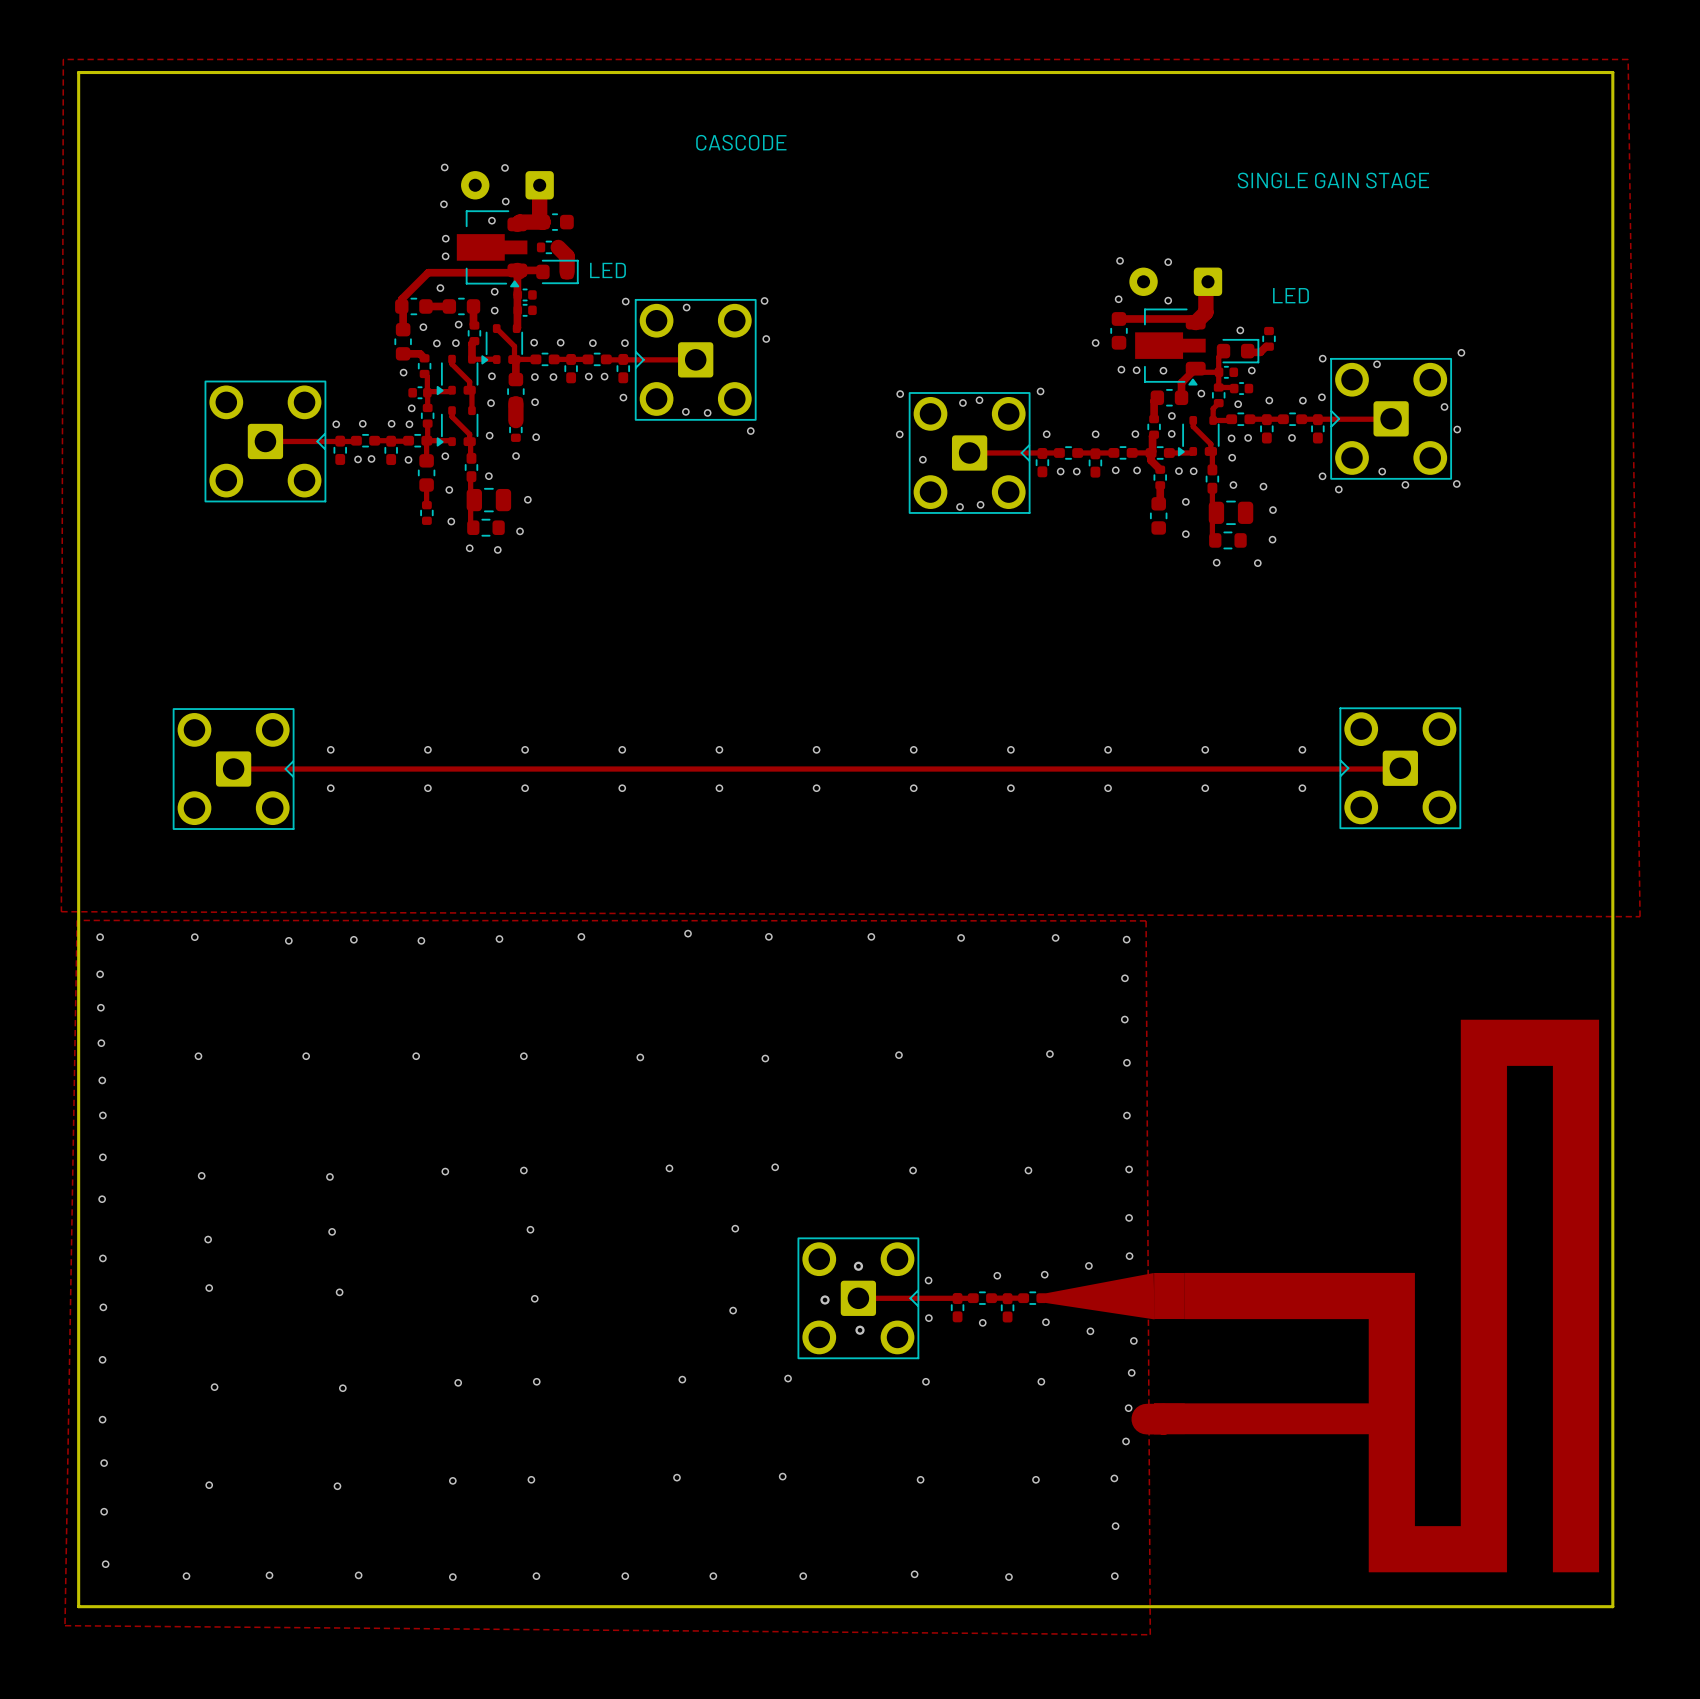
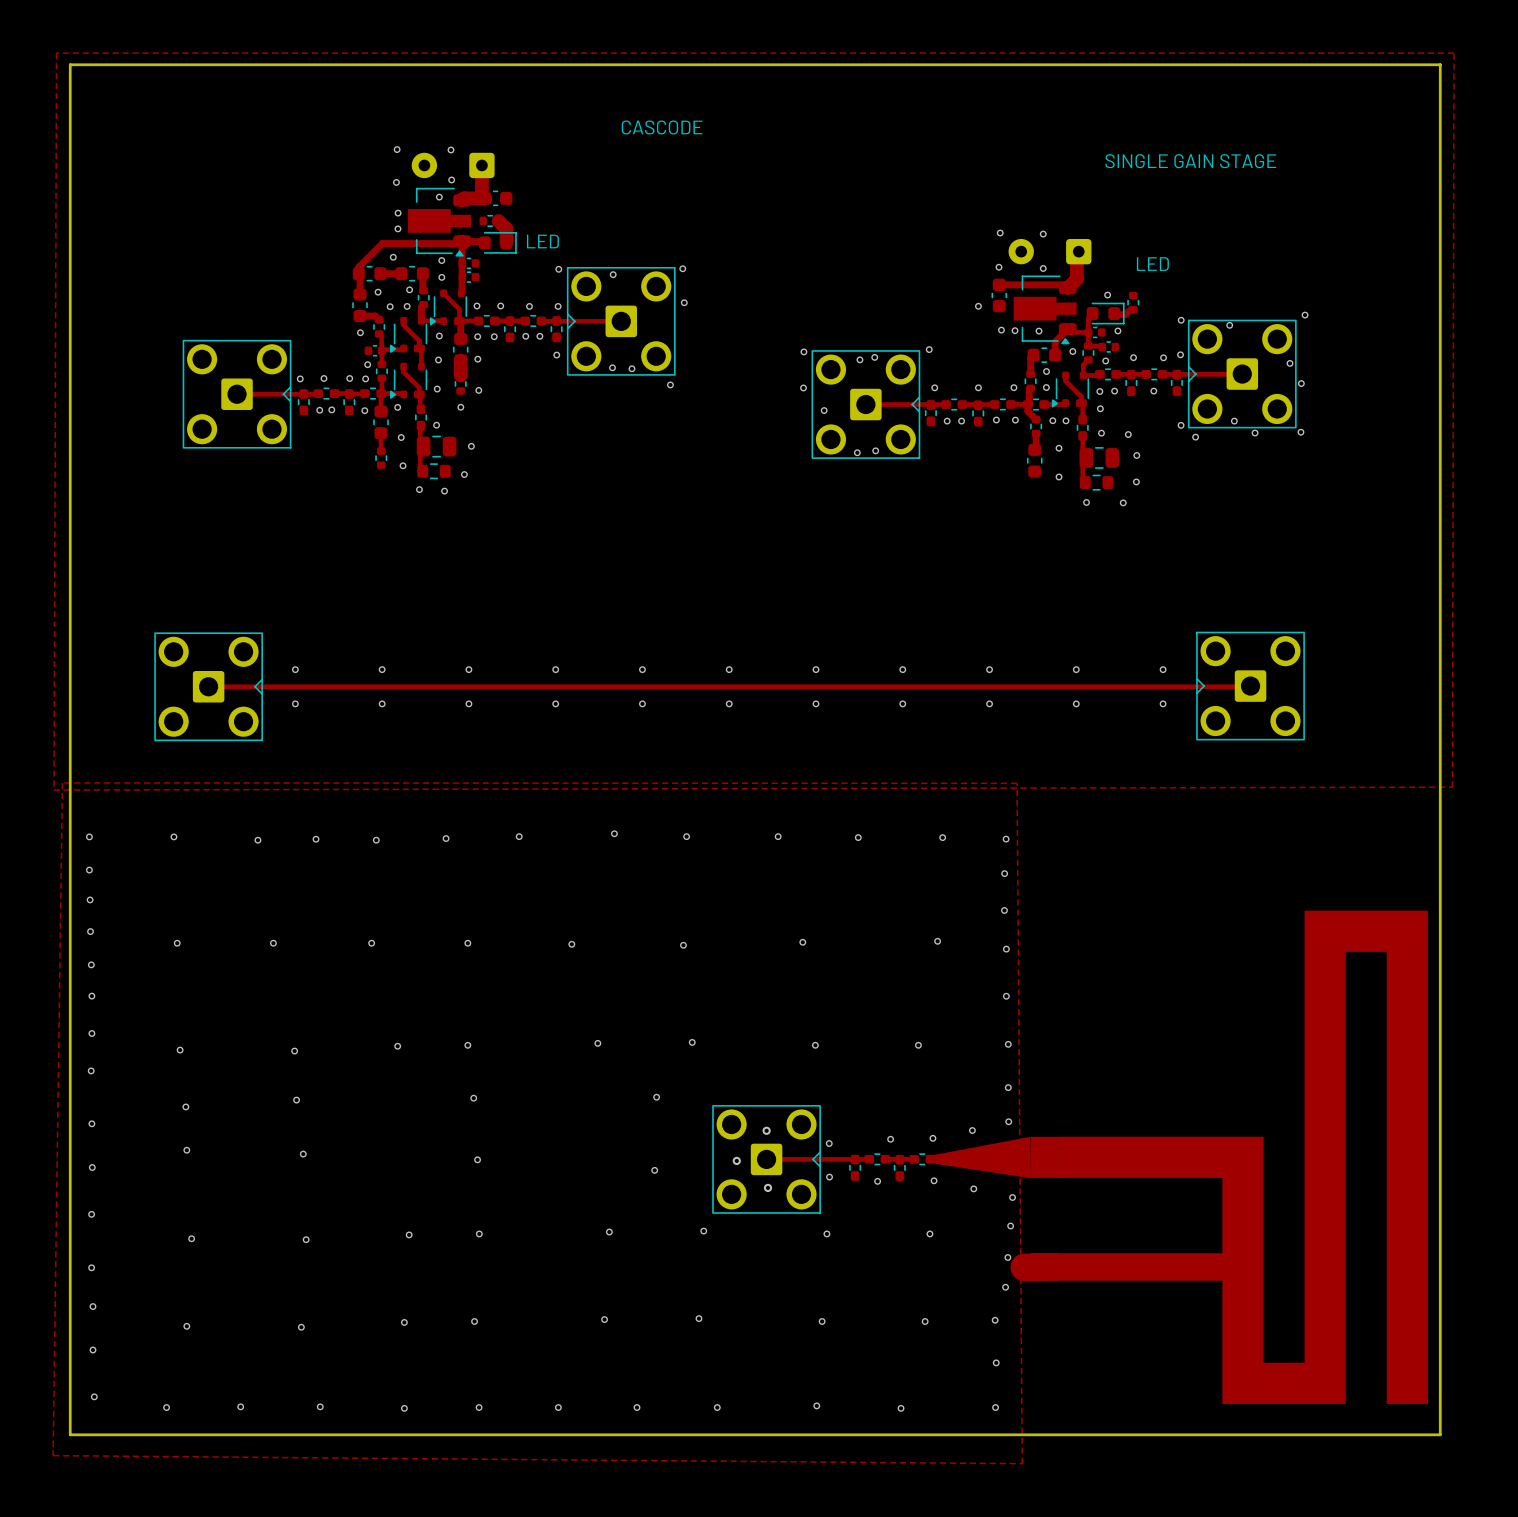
zone outline: (63, 59) (61, 911) (1640, 916) (1628, 59) -> (56, 53) (54, 790) (1452, 787) (1453, 53)
zone outline: (77, 920) (65, 1625) (1150, 1634) (1146, 920) (77, 920) -> (62, 782) (53, 1455) (1022, 1463) (1017, 783) (62, 782)

